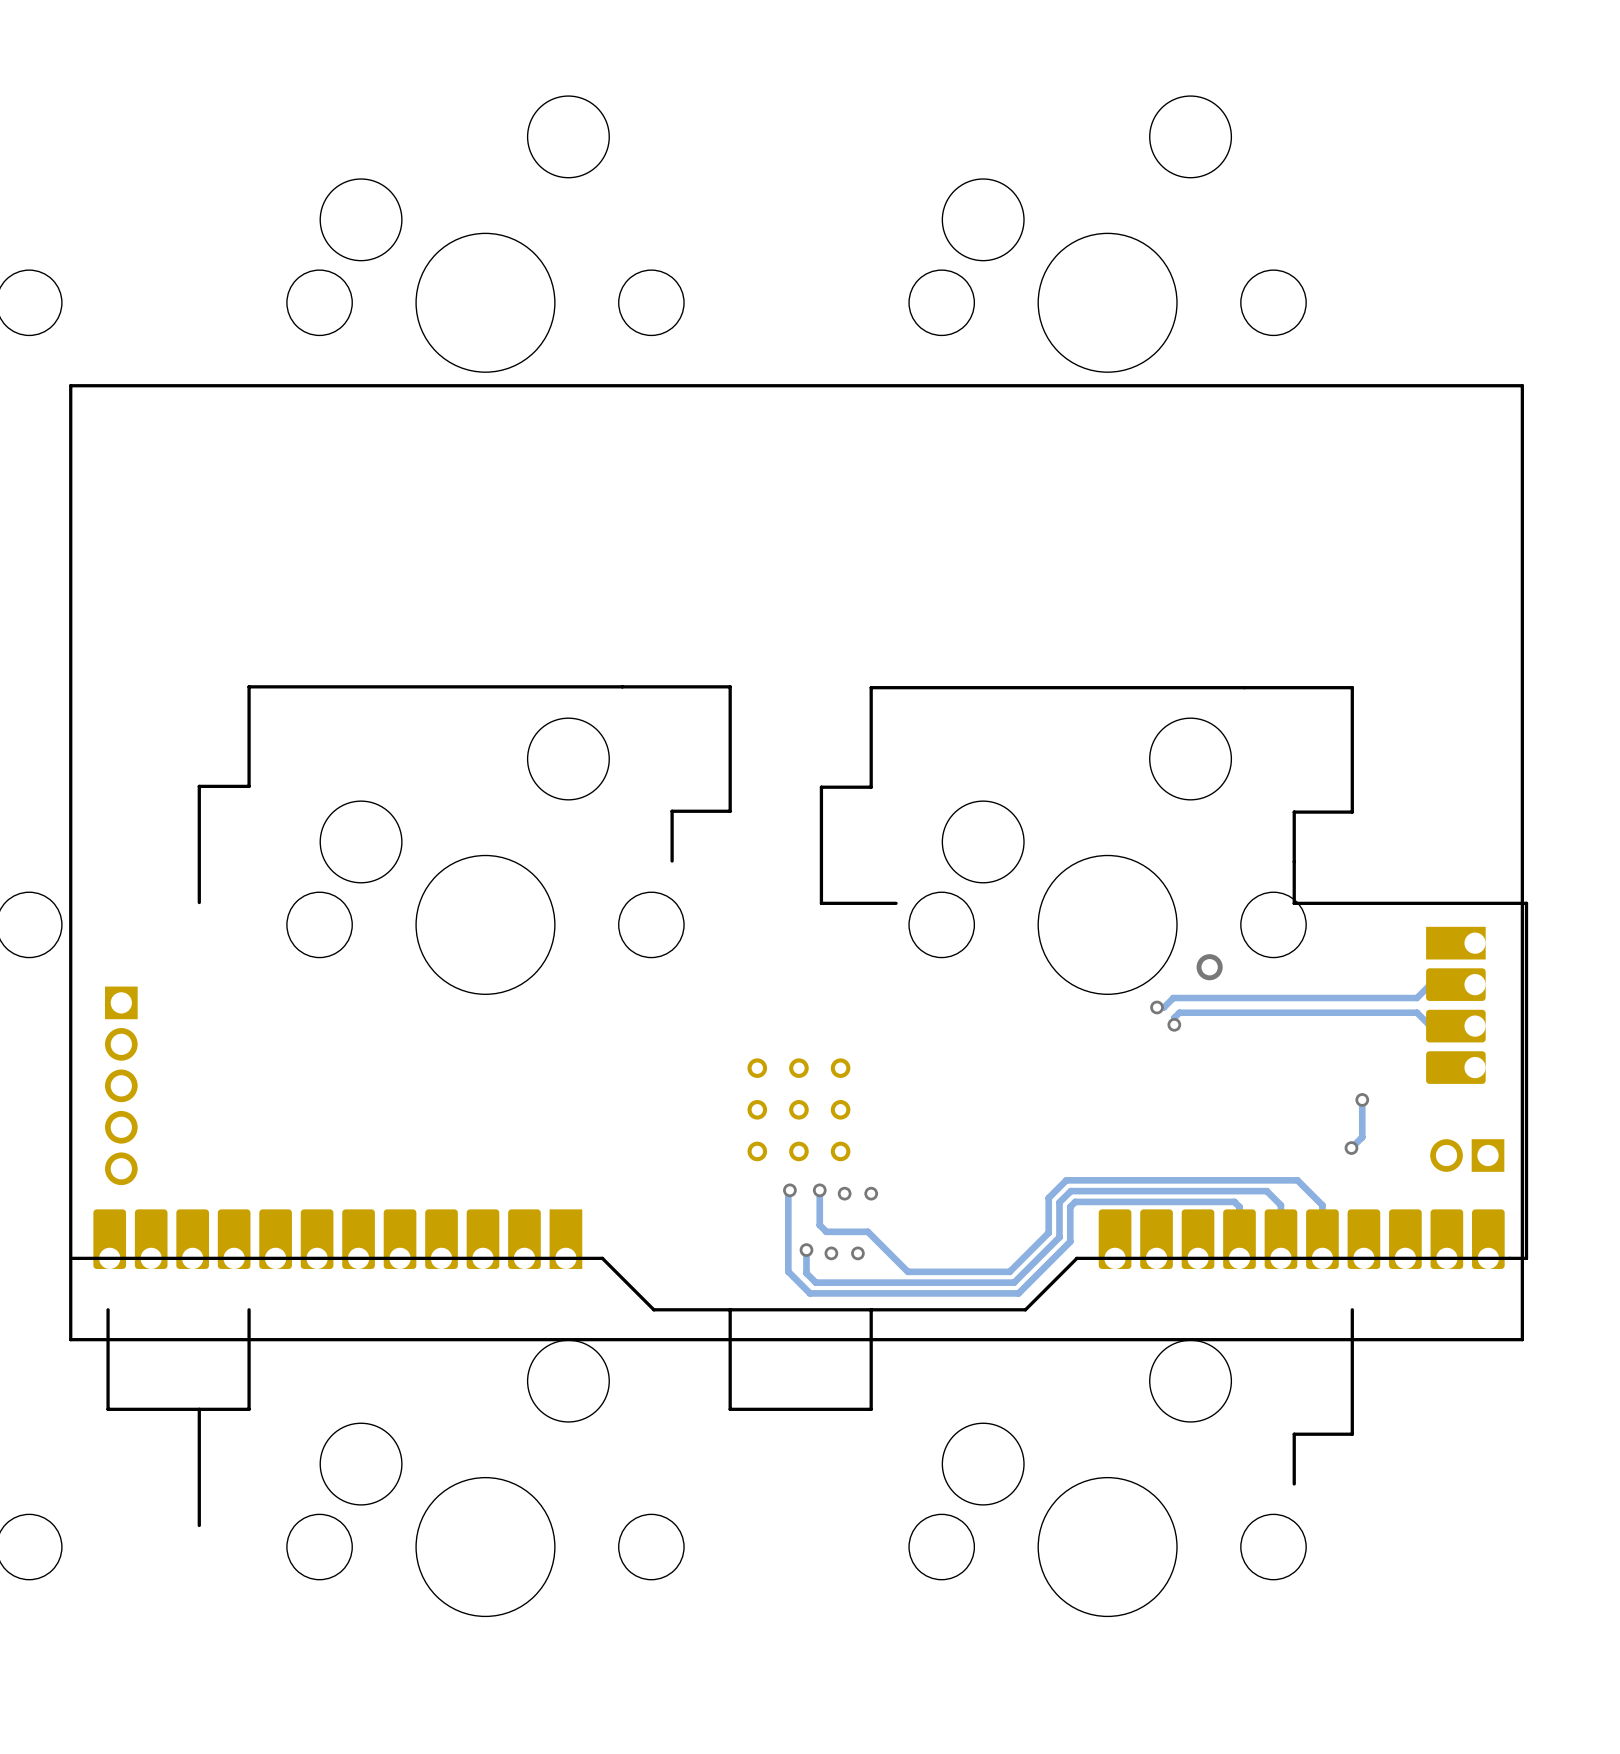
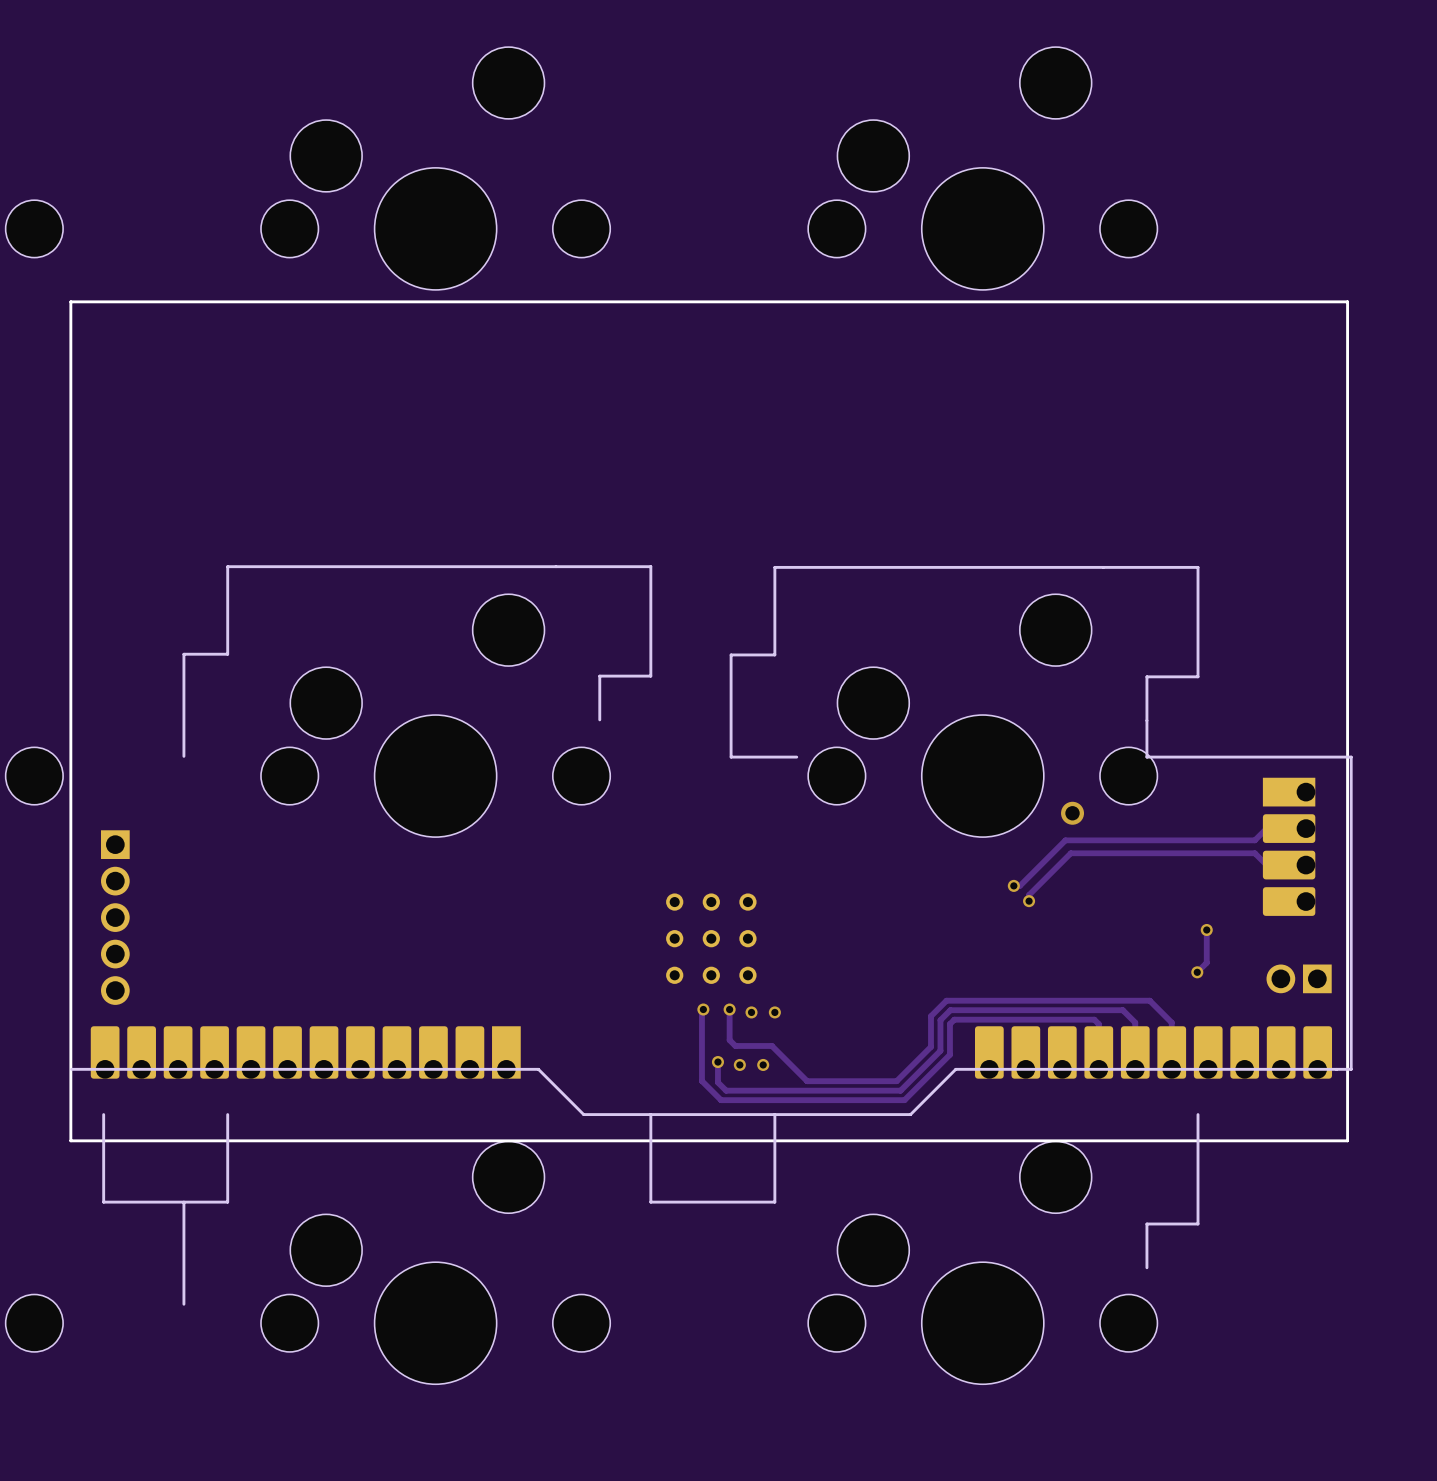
track: (1201, 998) (1173, 998) (1163, 1007) (1157, 1007) -> (1065, 840) (1019, 885) (1013, 885)
via: (1157, 1007) -> none
track: (1207, 1012) (1179, 1012) (1174, 1017) (1174, 1024) -> (1070, 853) (1029, 895) (1029, 901)
via: (1174, 1024) -> none
via: none -> (1013, 885)
via: none -> (1029, 901)

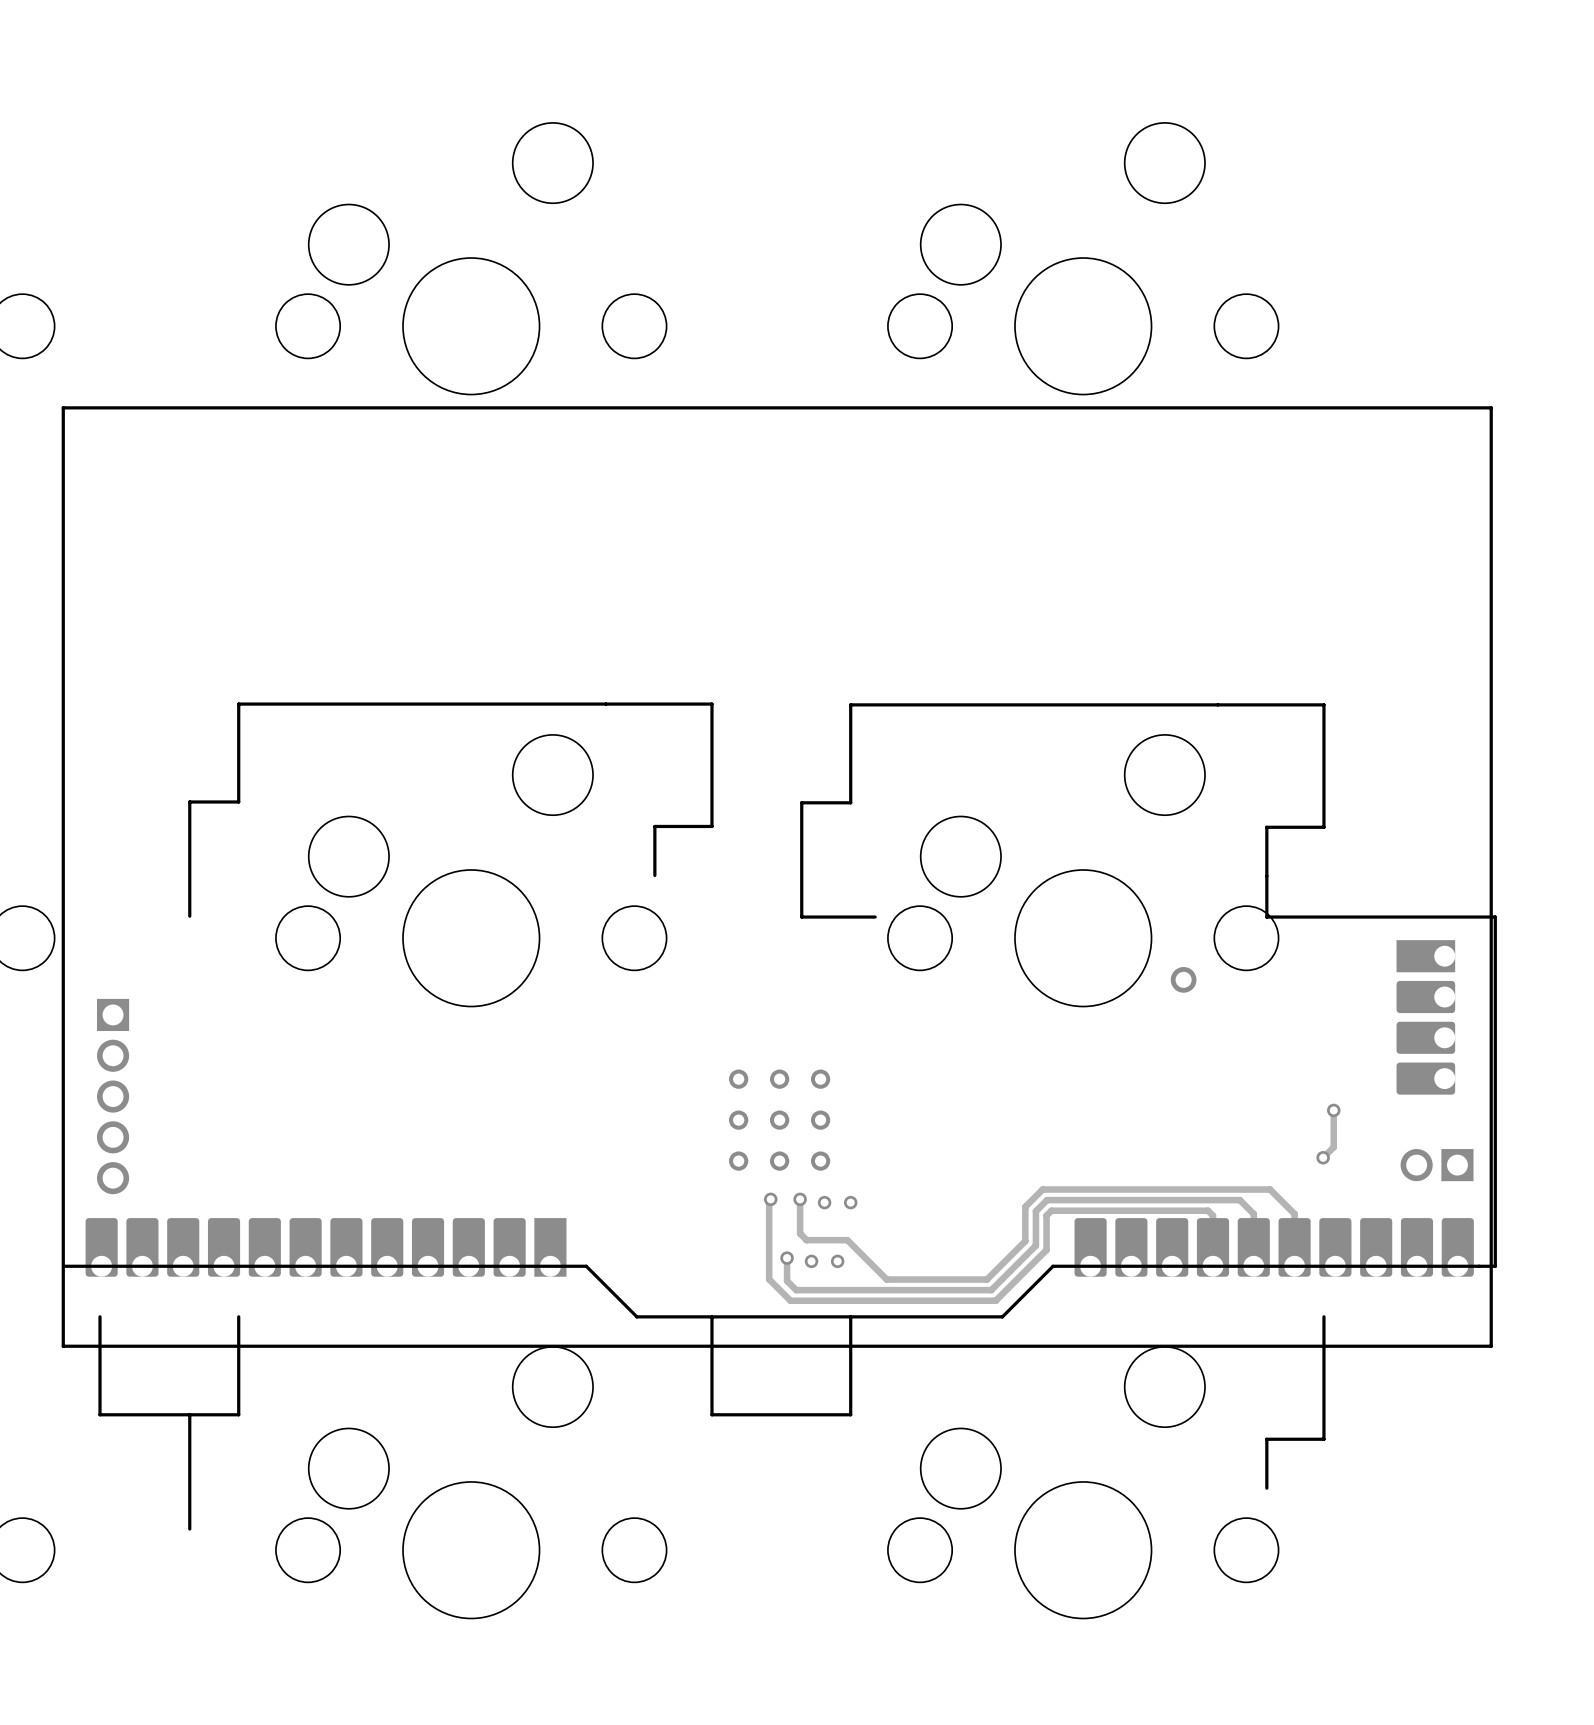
track: (1305, 828) (1266, 828) (1254, 840) (1065, 840) (1019, 885) (1013, 885) -> none
track: (1305, 865) (1266, 865) (1254, 853) (1070, 853) (1029, 895) (1029, 901) -> none
via: (1013, 885) -> none
via: (1029, 901) -> none

